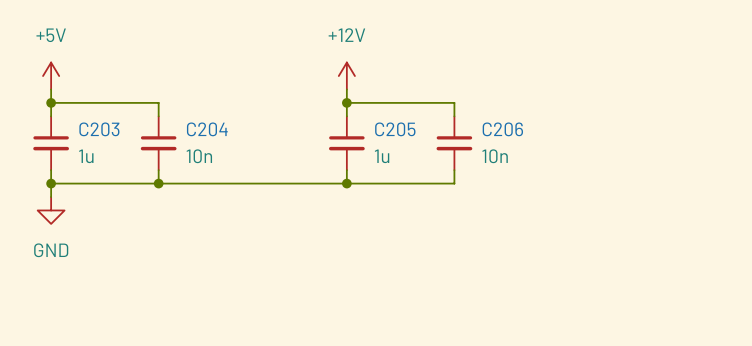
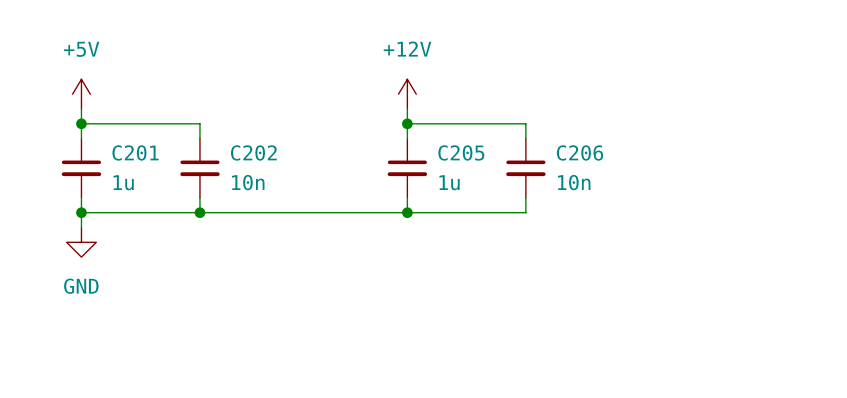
C203 name: C203 (99, 129) -> C201 (135, 152)
C204 name: C204 (207, 129) -> C202 (253, 152)

